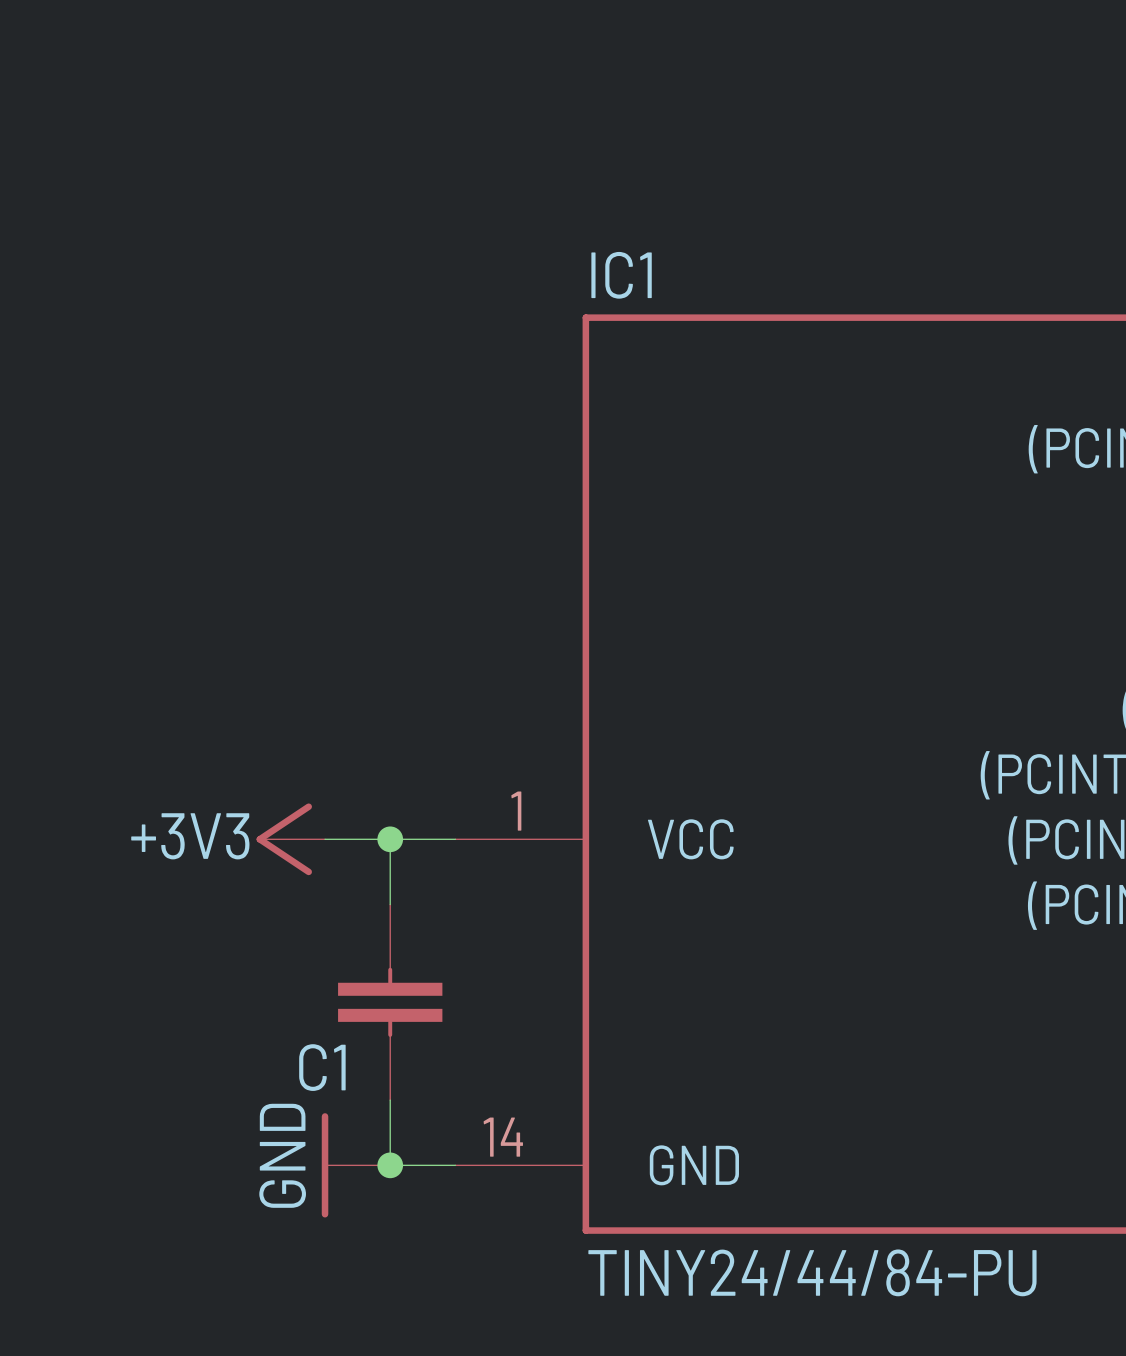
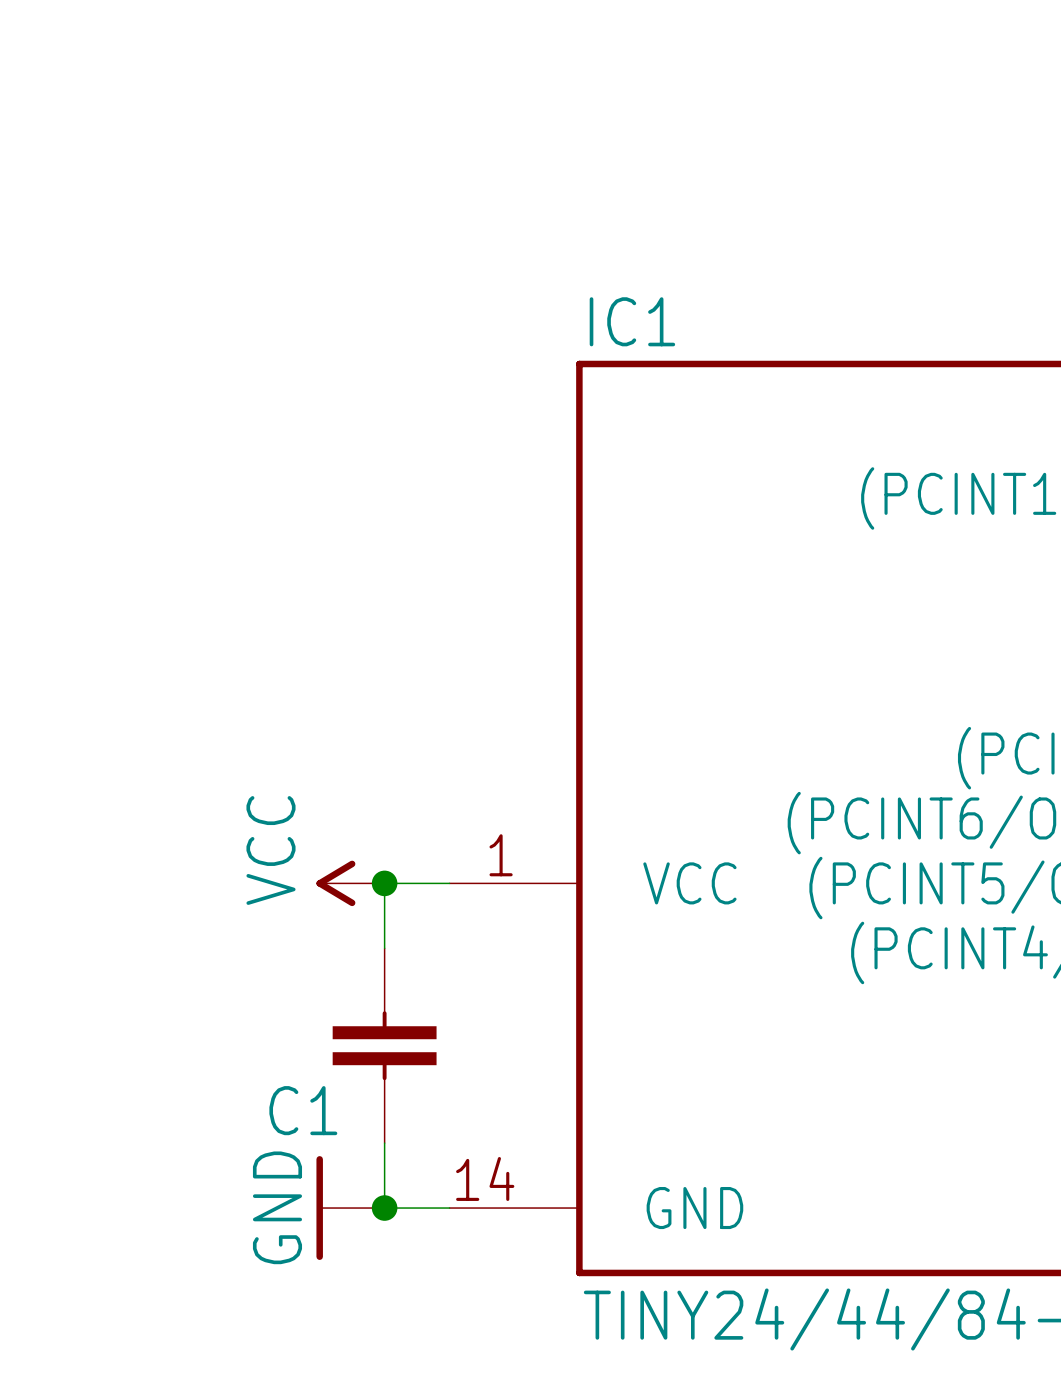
power symbol: +3V3 (290, 839) -> none
power symbol: none -> VCC (350, 883)

